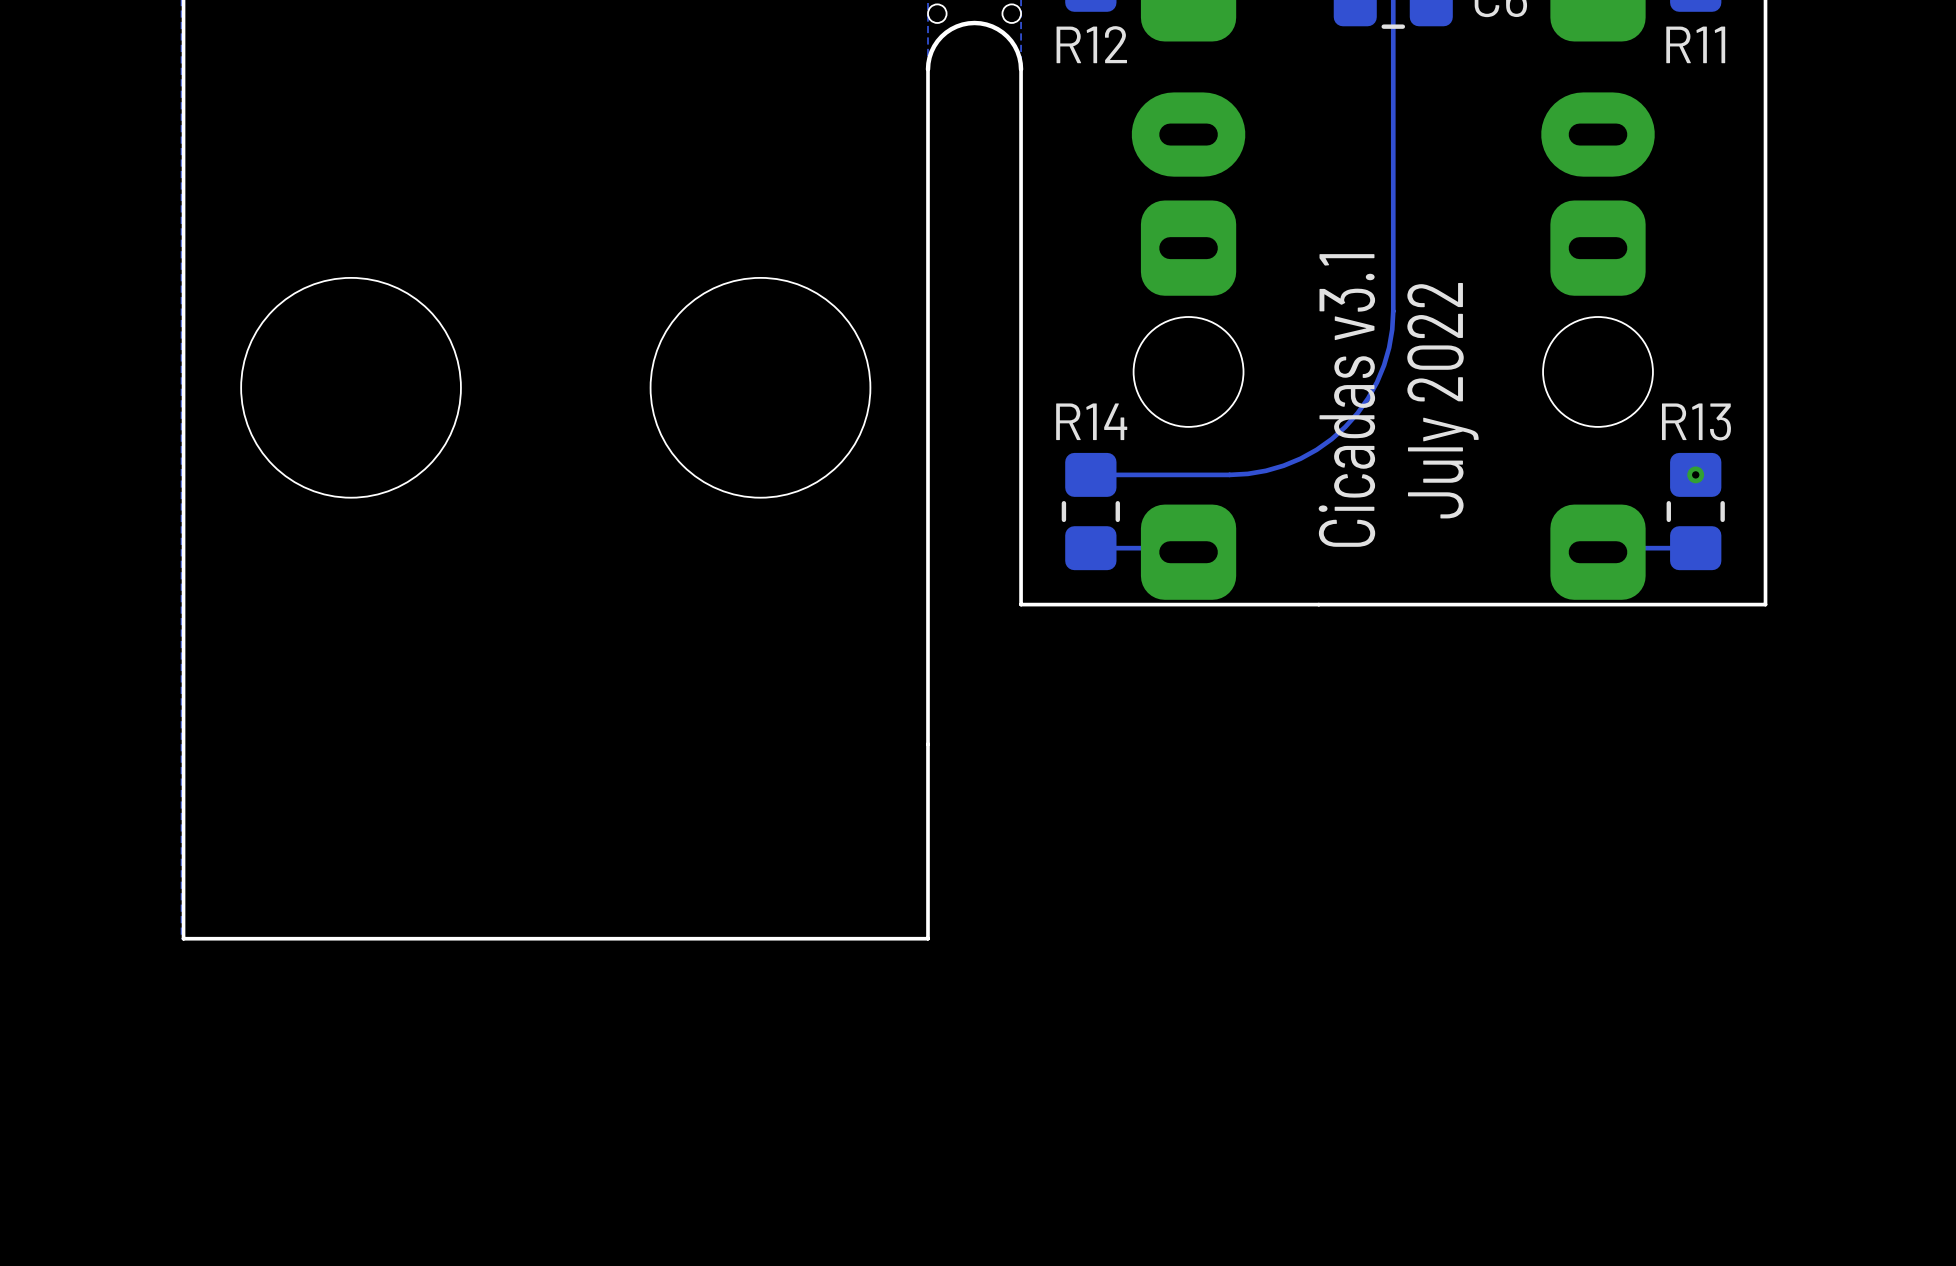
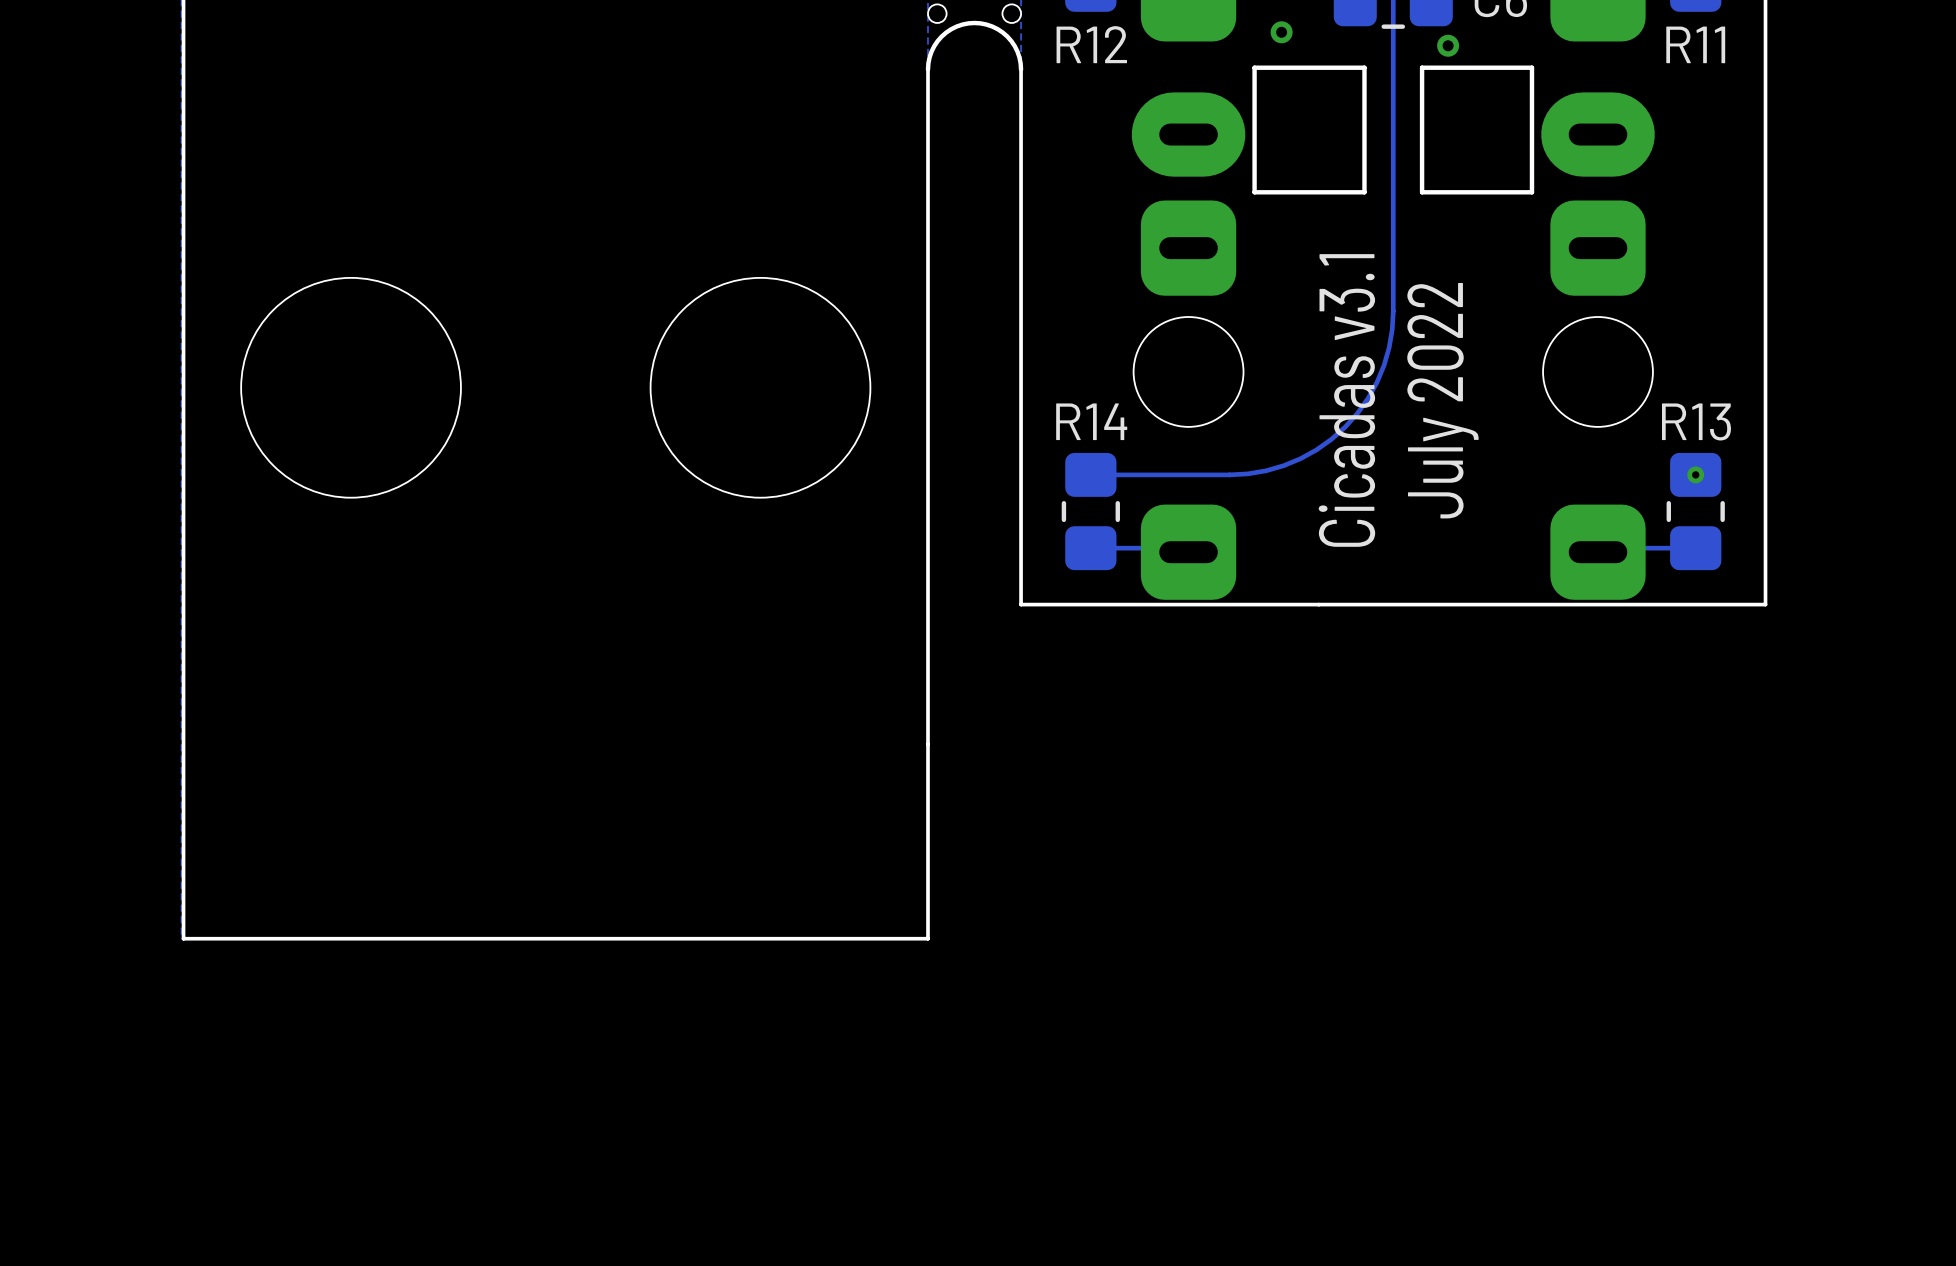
via: none -> (1281, 32)
via: none -> (1448, 45)
part: none -> (1309, 130)
part: none -> (1477, 130)

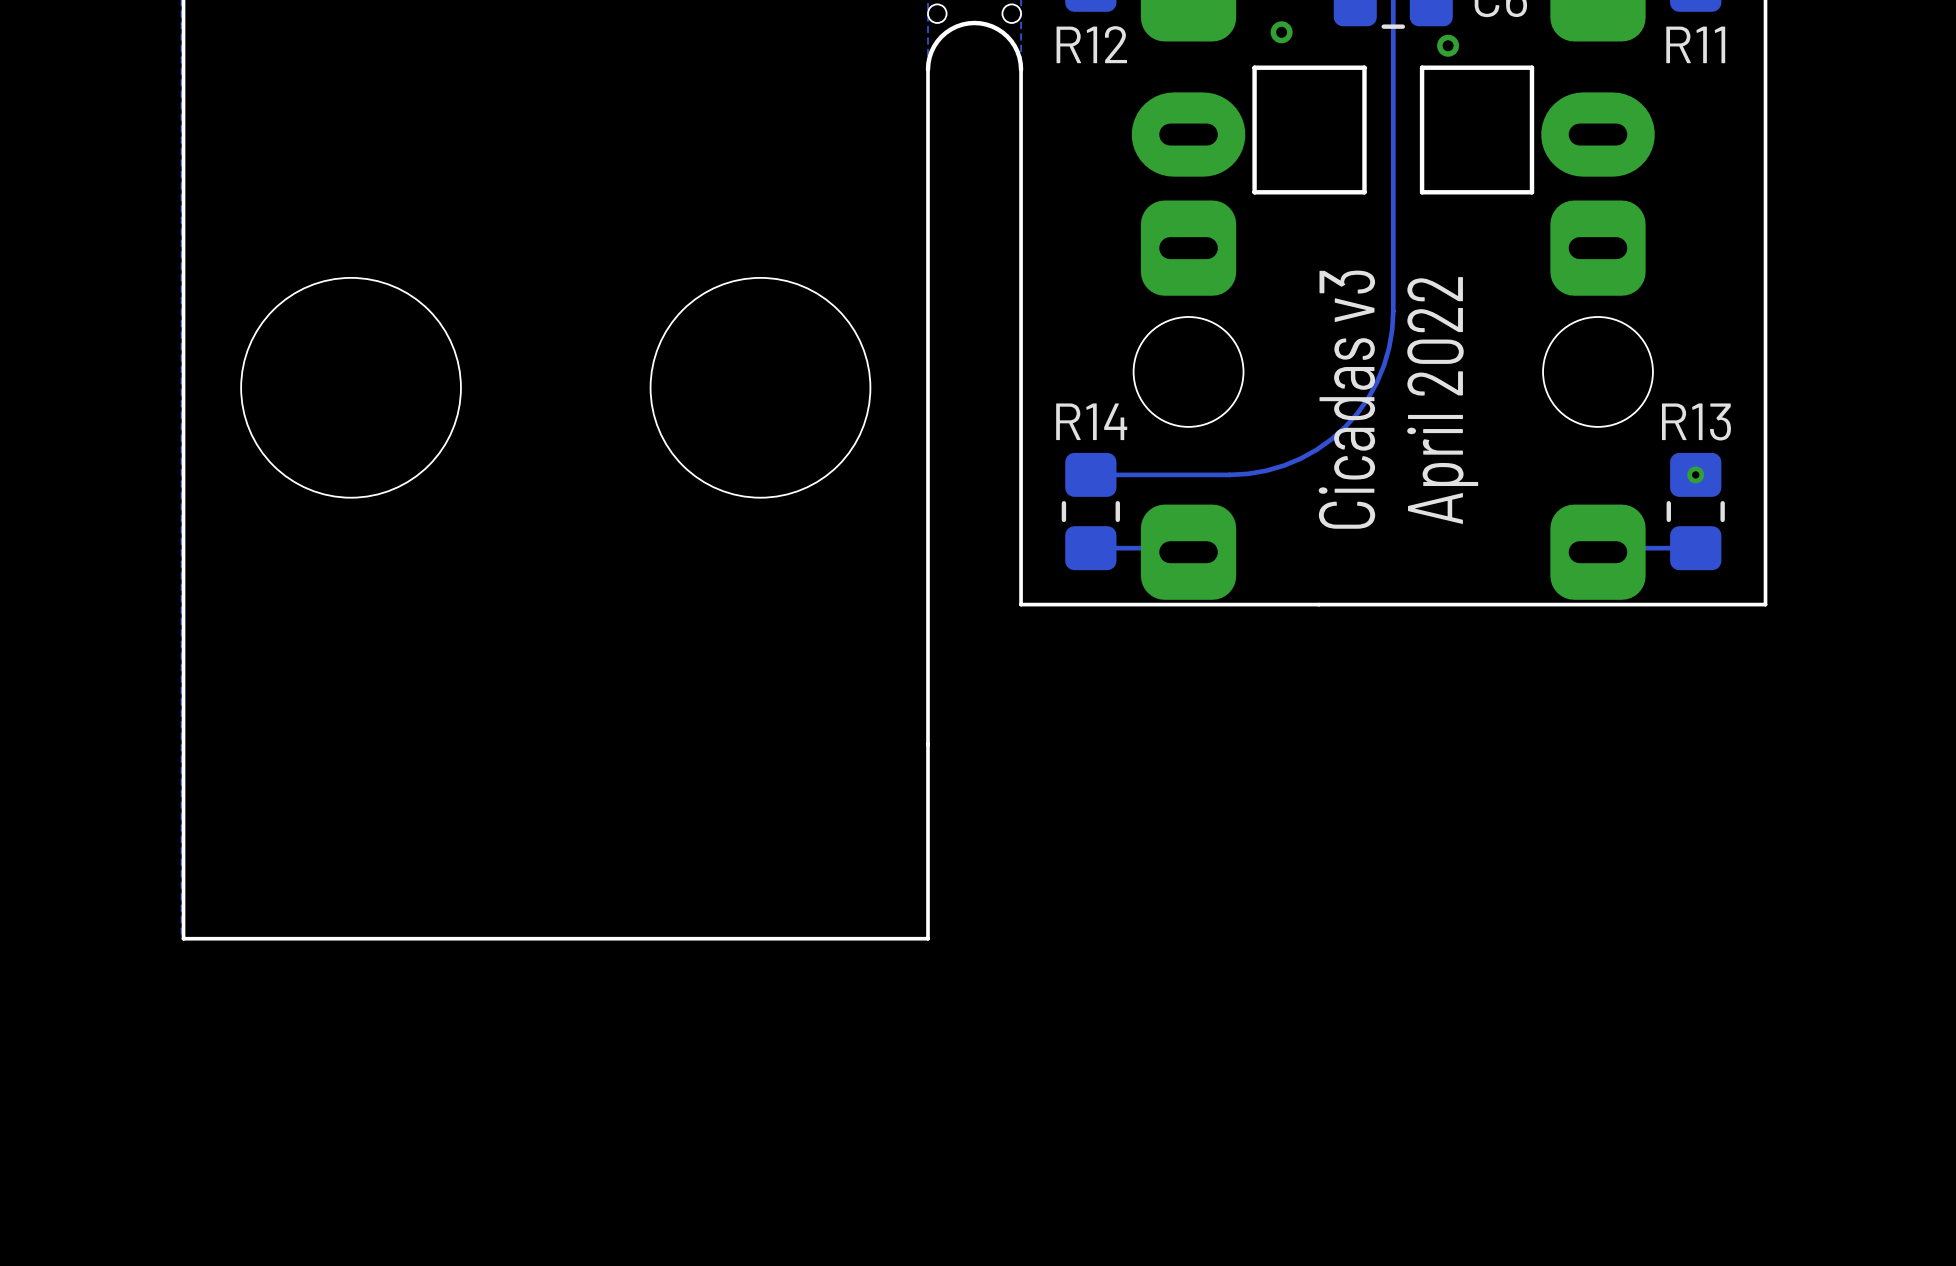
text: Cicadas v3.1 (1346, 400) -> Cicadas v3 (1346, 399)
text: July 2022 (1442, 400) -> April 2022 (1442, 400)

